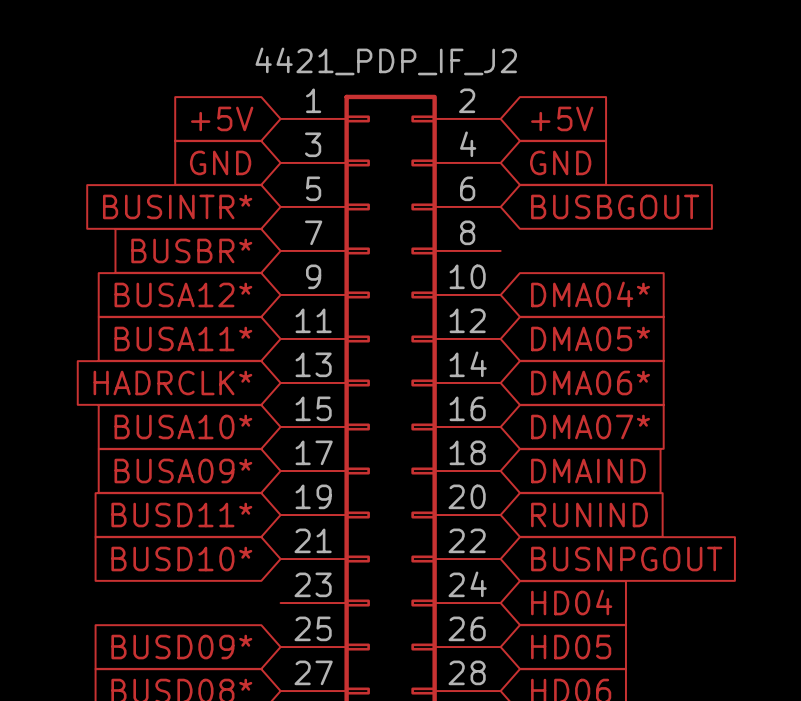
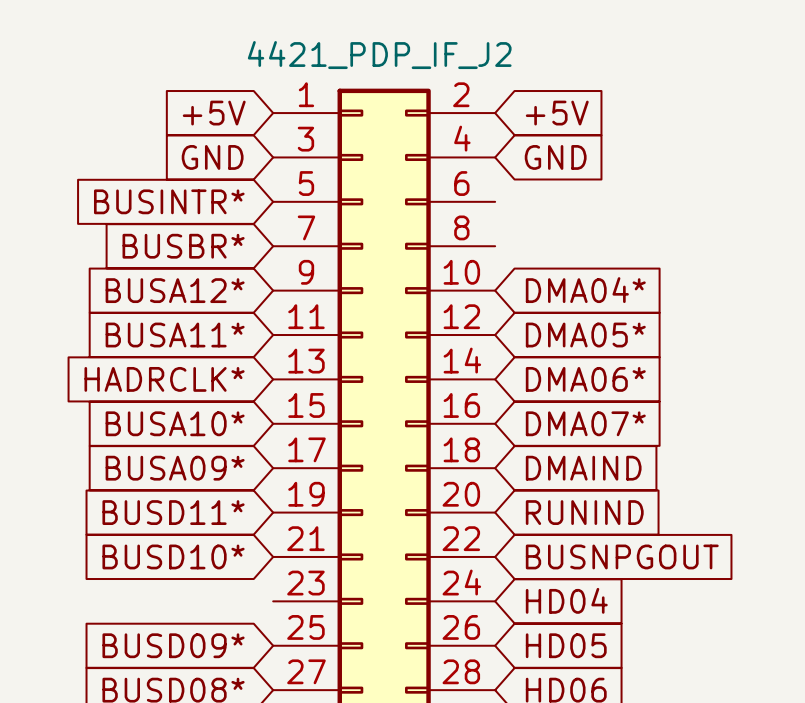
global label: BUSBGOUT (615, 206) -> none

